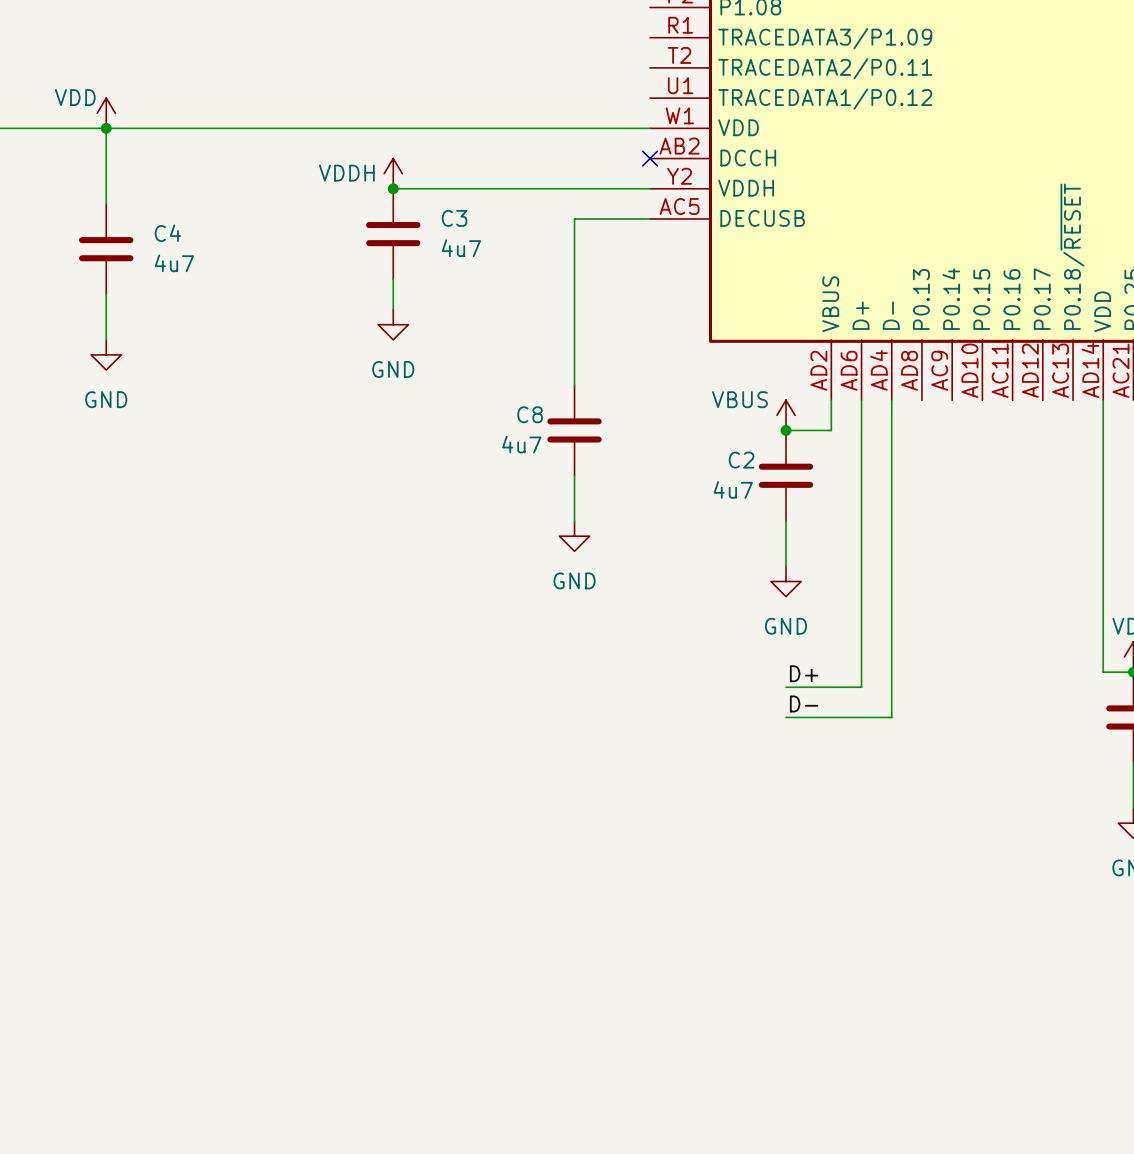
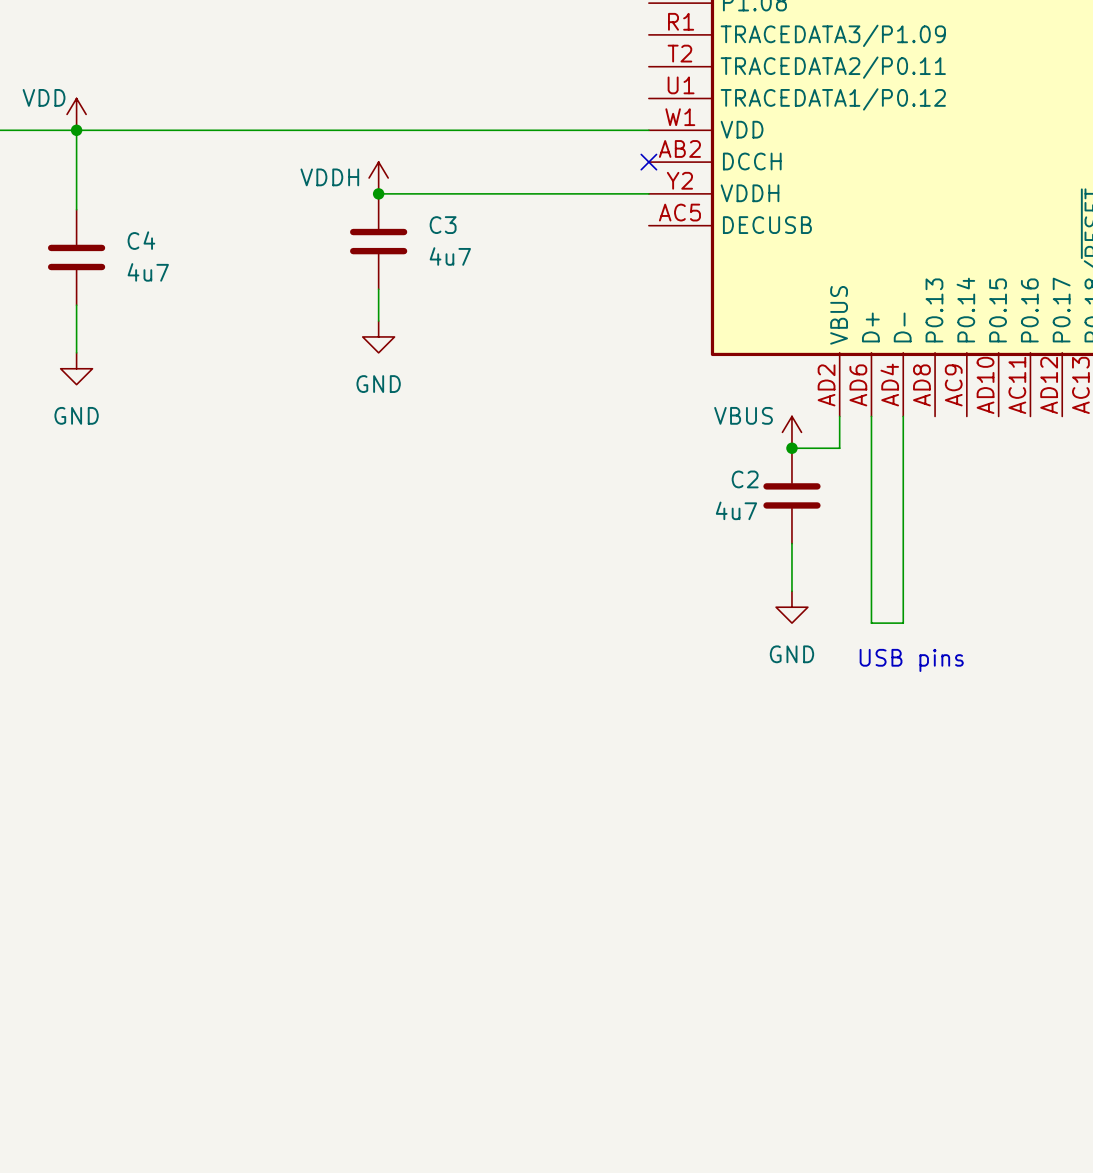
wire: (650, 218) (574, 218) (574, 385) -> none
C8: 4u7 (574, 430) -> none
wire: (574, 475) (574, 521) -> none
power symbol: GND (574, 536) -> none
wire: (861, 596) (861, 687) (786, 687) -> (871, 623) (903, 623)
wire: (891, 596) (891, 717) (786, 717) -> none
text: none -> USB pins (911, 660)
label: D+ (804, 673) -> none
label: D- (804, 703) -> none

